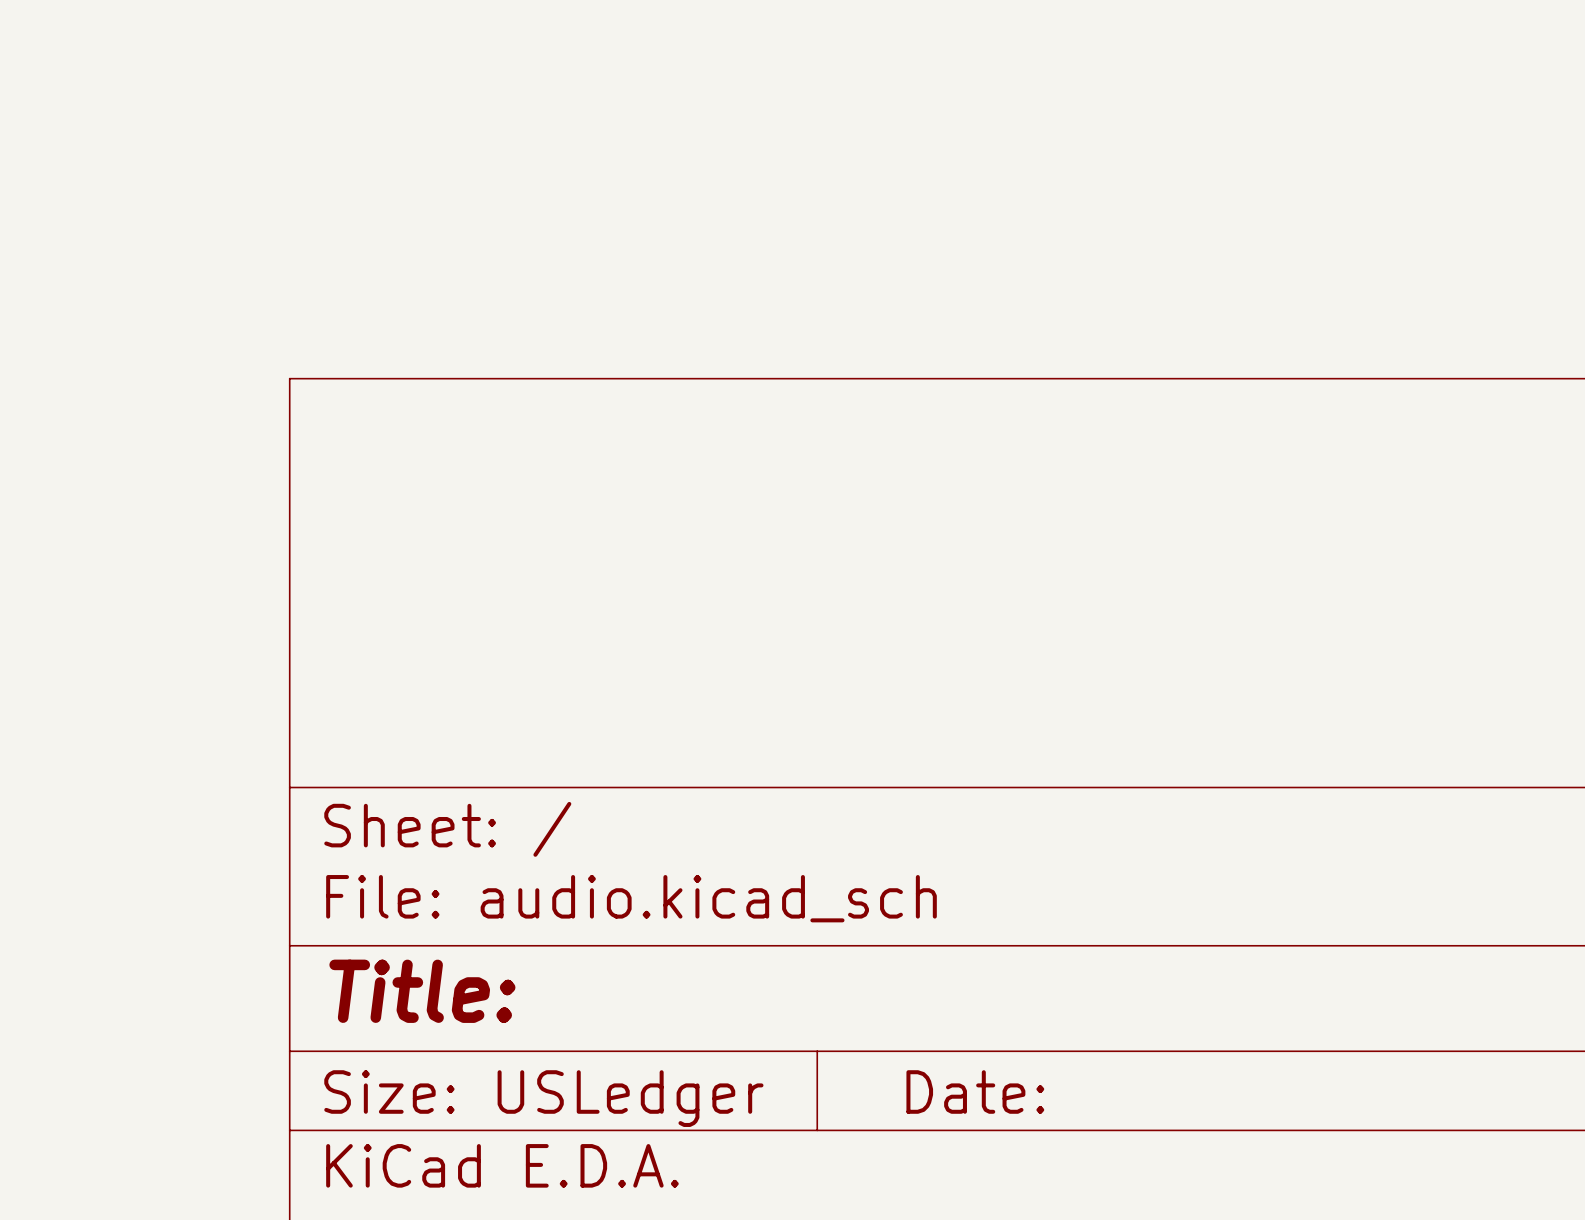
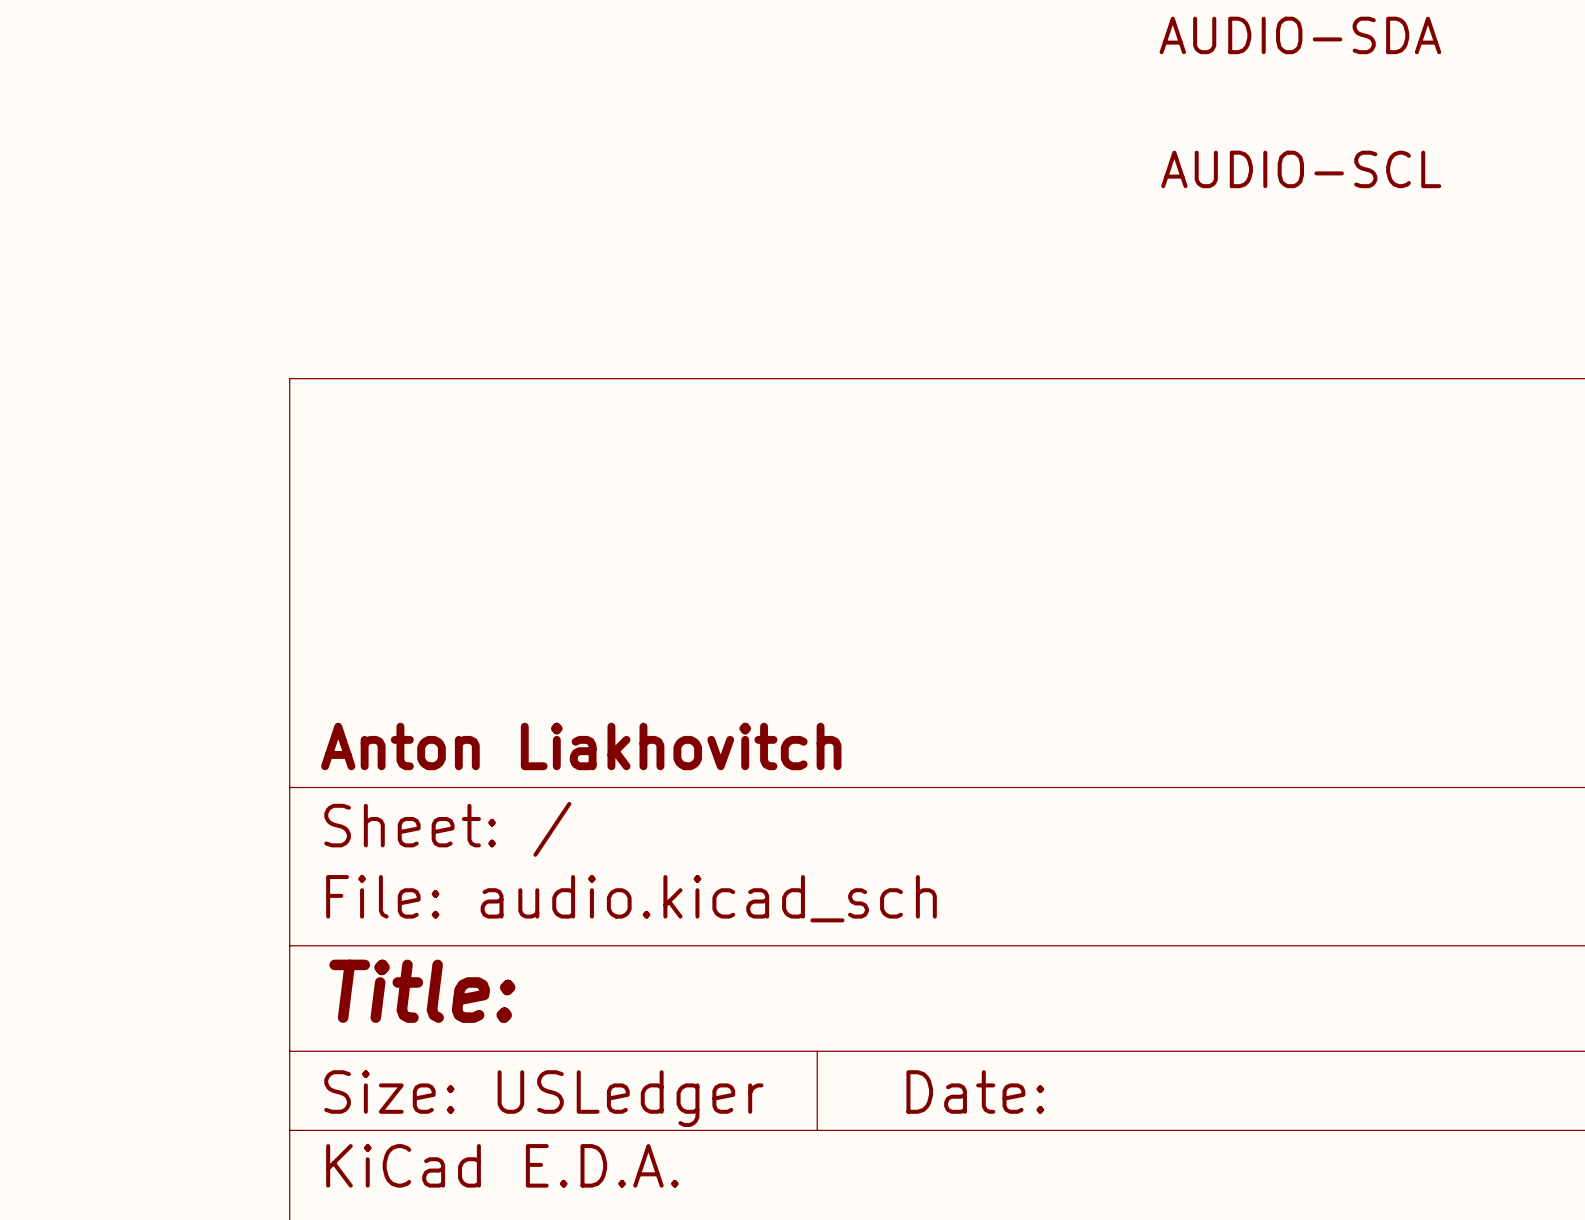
label: none -> AUDIO-SDA (1300, 35)
label: none -> AUDIO-SCL (1301, 169)
title block: none -> Anton Liakhovitch (581, 746)

